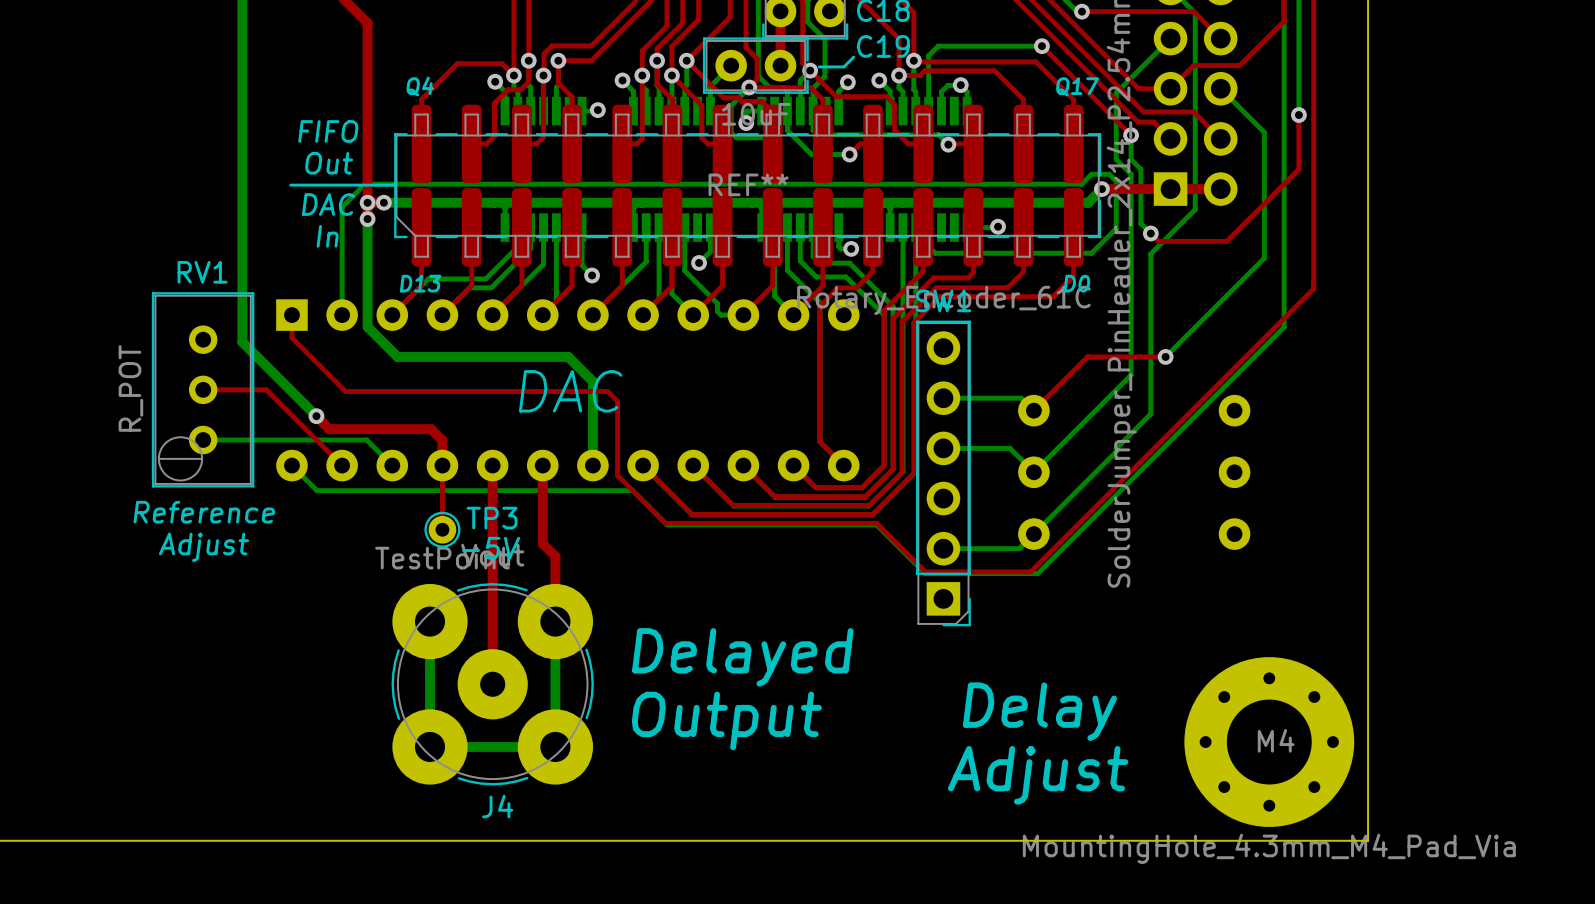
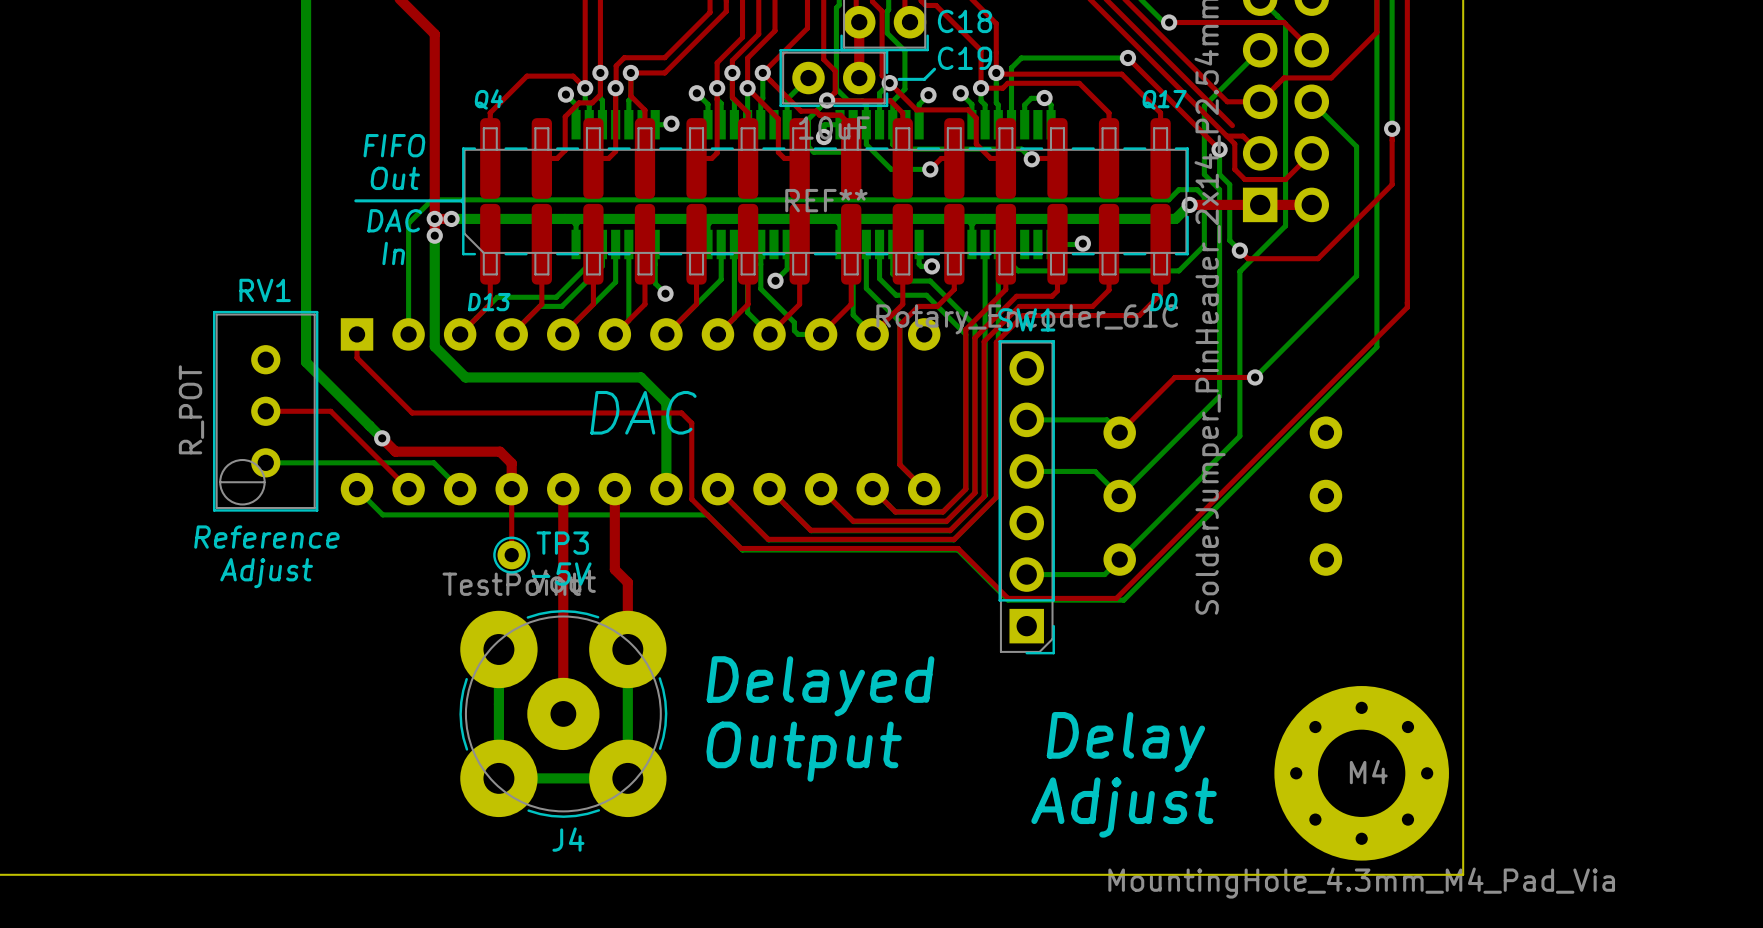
top track: (1143, 111) (1193, 111) (1220, 138) -> (1226, 136) (1234, 144) (1234, 169) (1244, 179) (1285, 179) (1311, 153)

